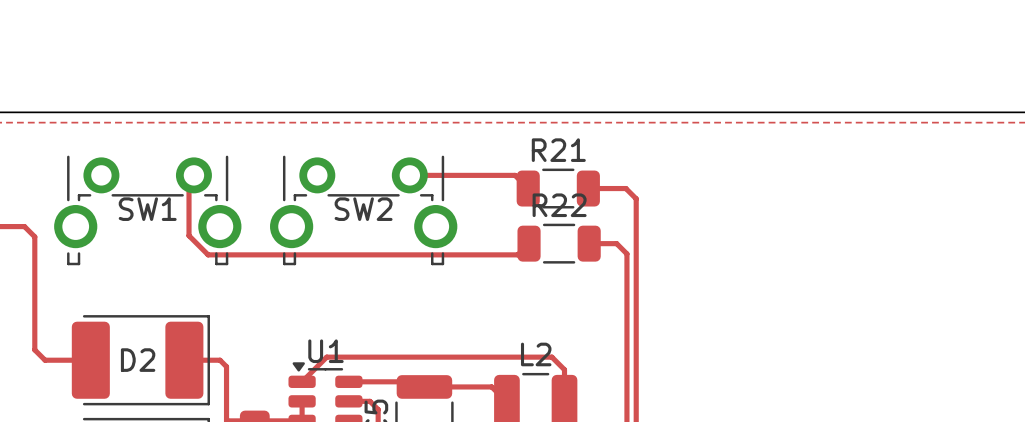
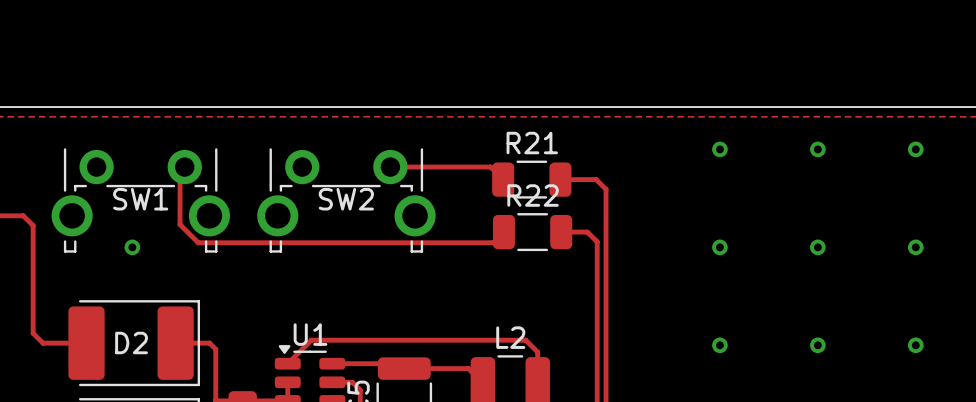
via: none -> (719, 149)
via: none -> (817, 149)
via: none -> (915, 149)
via: none -> (132, 247)
via: none -> (719, 247)
via: none -> (817, 247)
via: none -> (915, 247)
via: none -> (719, 345)
via: none -> (817, 345)
via: none -> (915, 345)

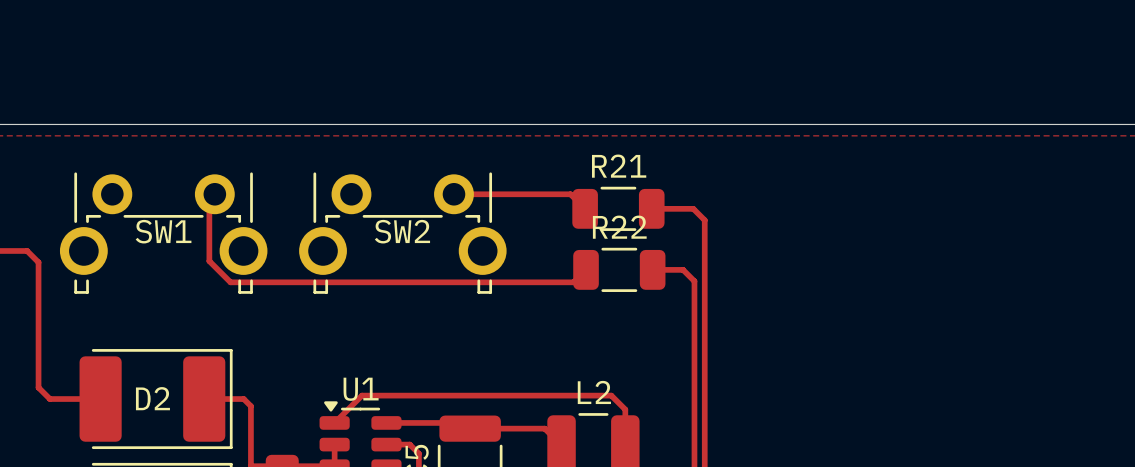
via: (719, 149) -> none
via: (817, 149) -> none
via: (915, 149) -> none
via: (132, 247) -> none
via: (719, 247) -> none
via: (817, 247) -> none
via: (915, 247) -> none
via: (719, 345) -> none
via: (817, 345) -> none
via: (915, 345) -> none

